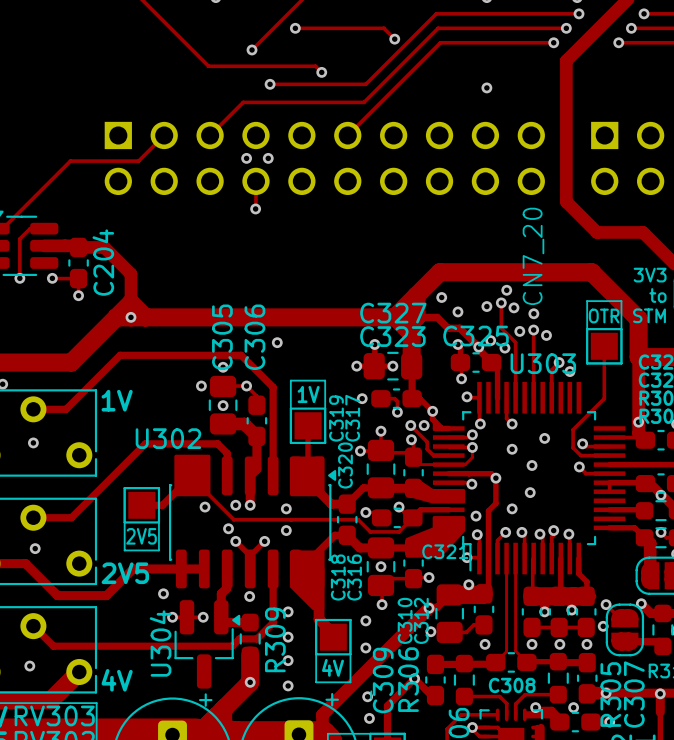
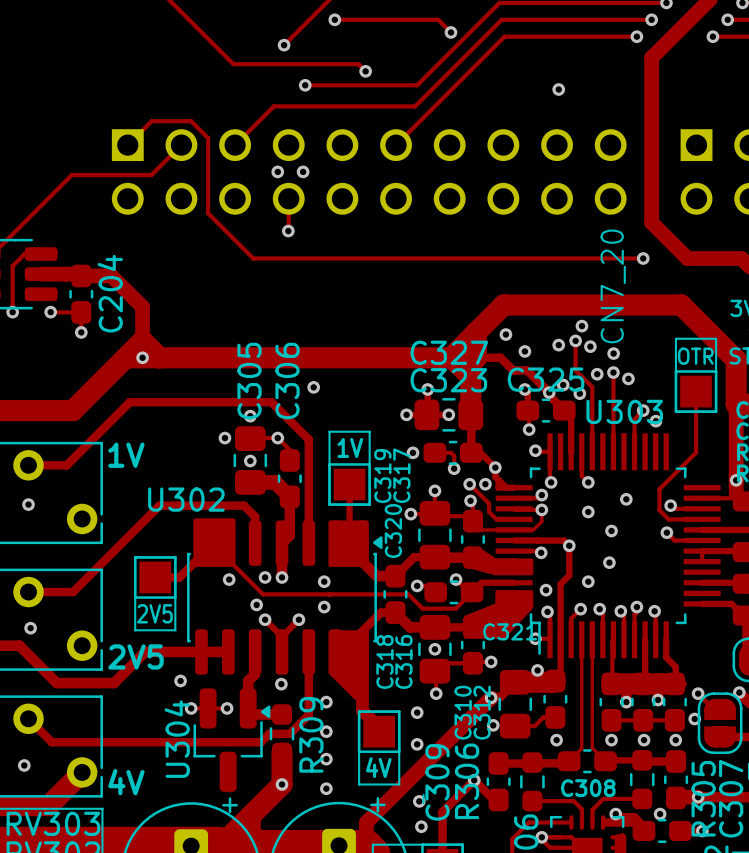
track: none -> (127, 145) (151, 121) (191, 121) (208, 138) (208, 213) (253, 258) (643, 258)
via: none -> (643, 258)

